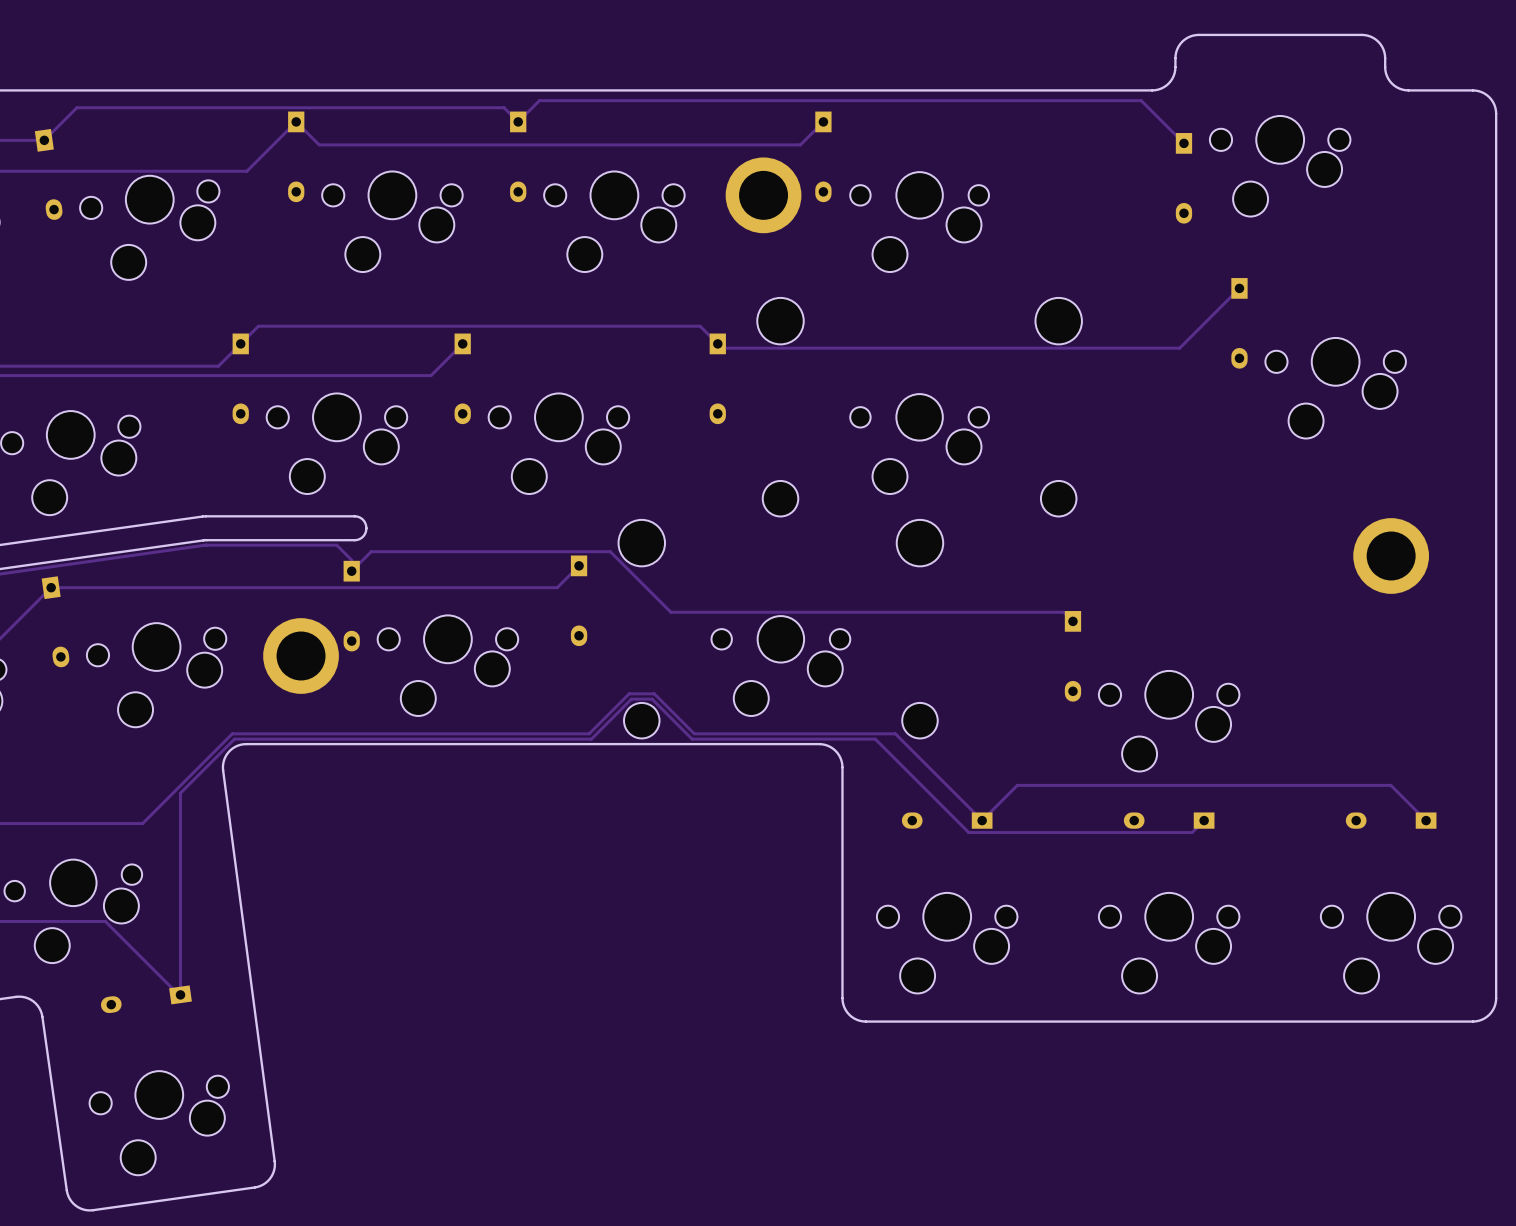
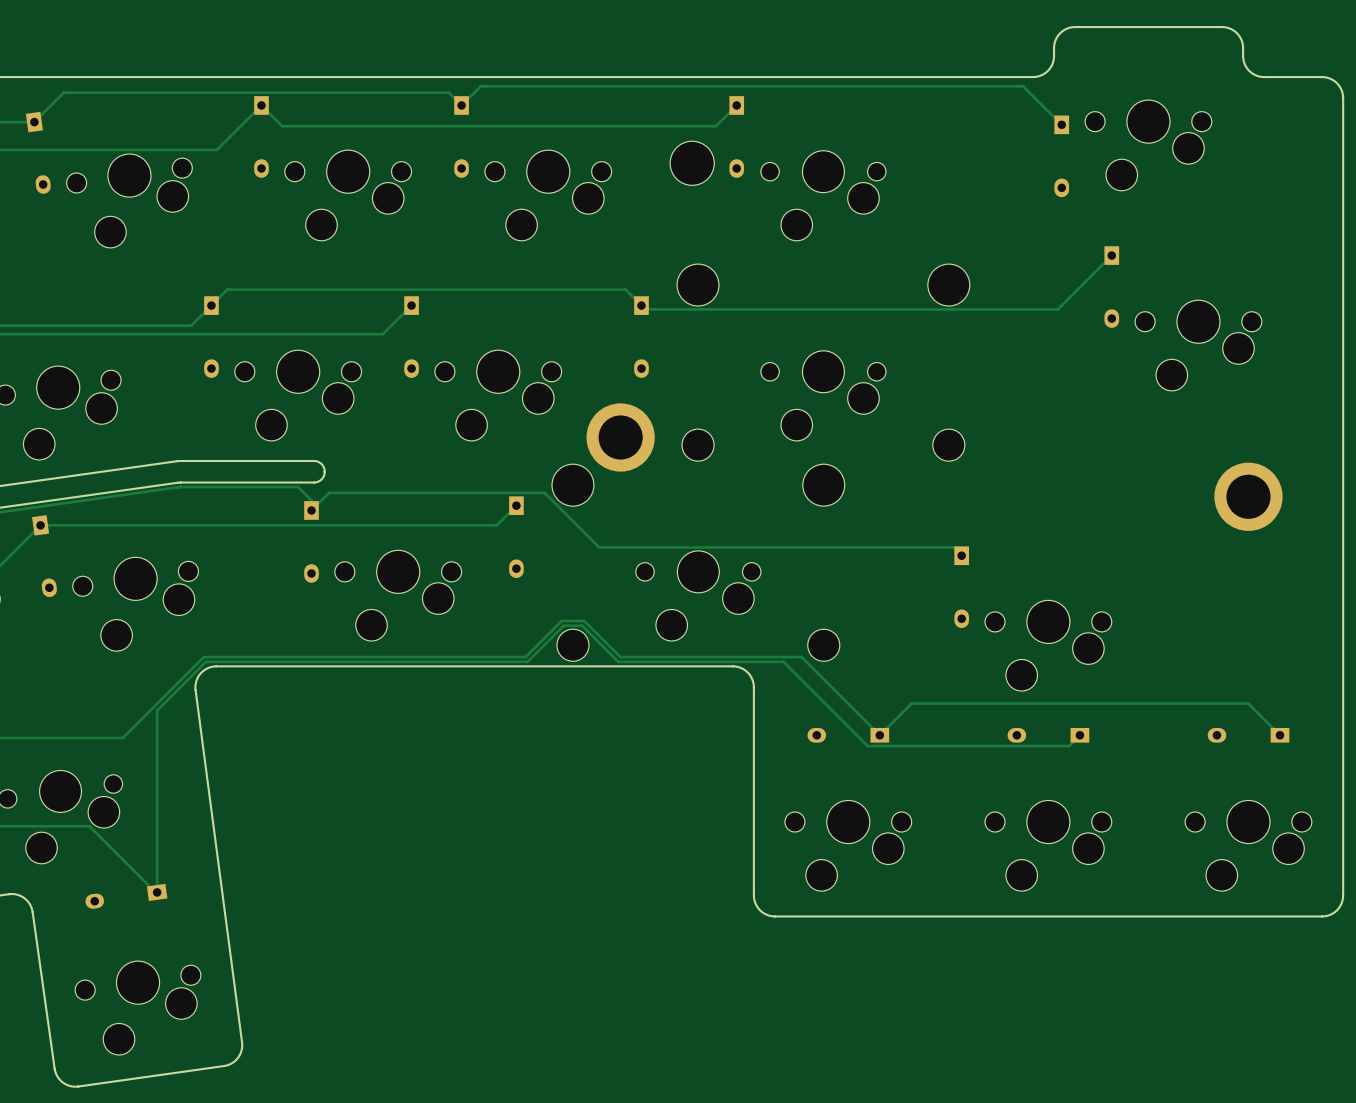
part: none -> (692, 163)
part: (763, 195) -> none
part: none -> (620, 437)
part: (301, 655) -> none

